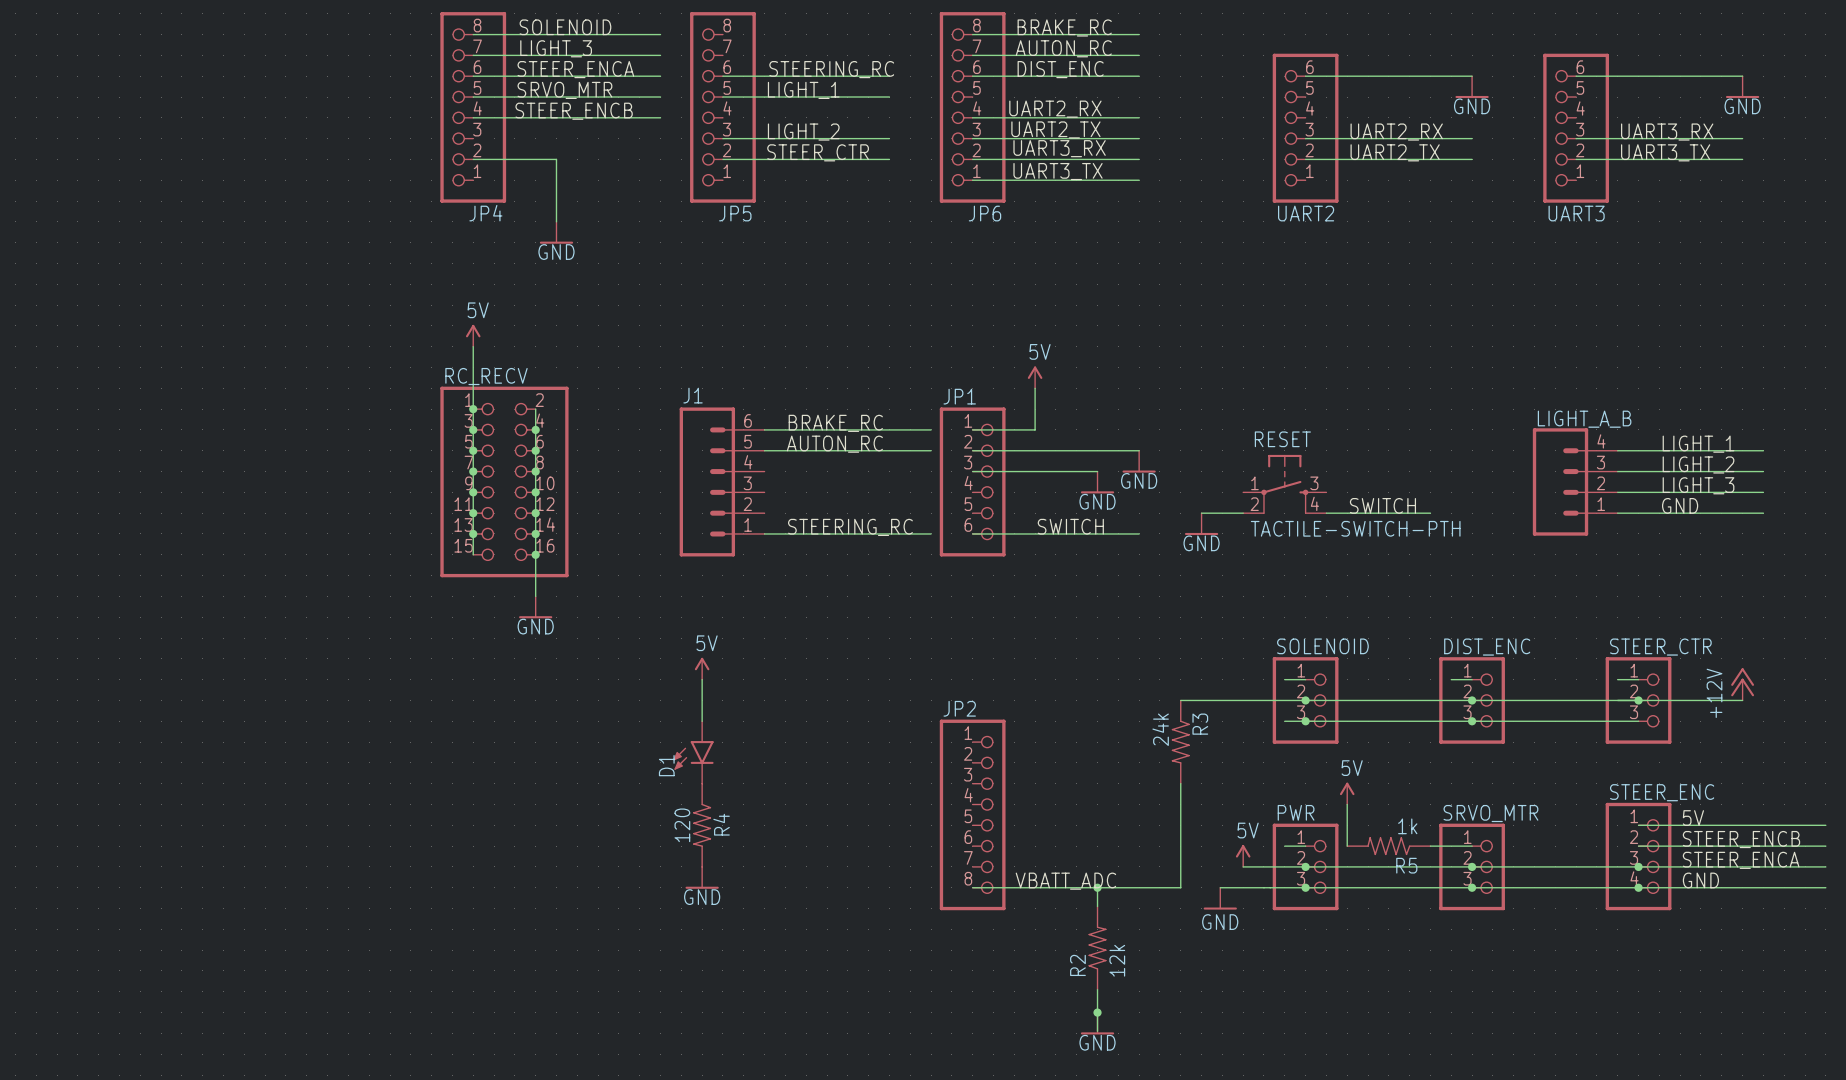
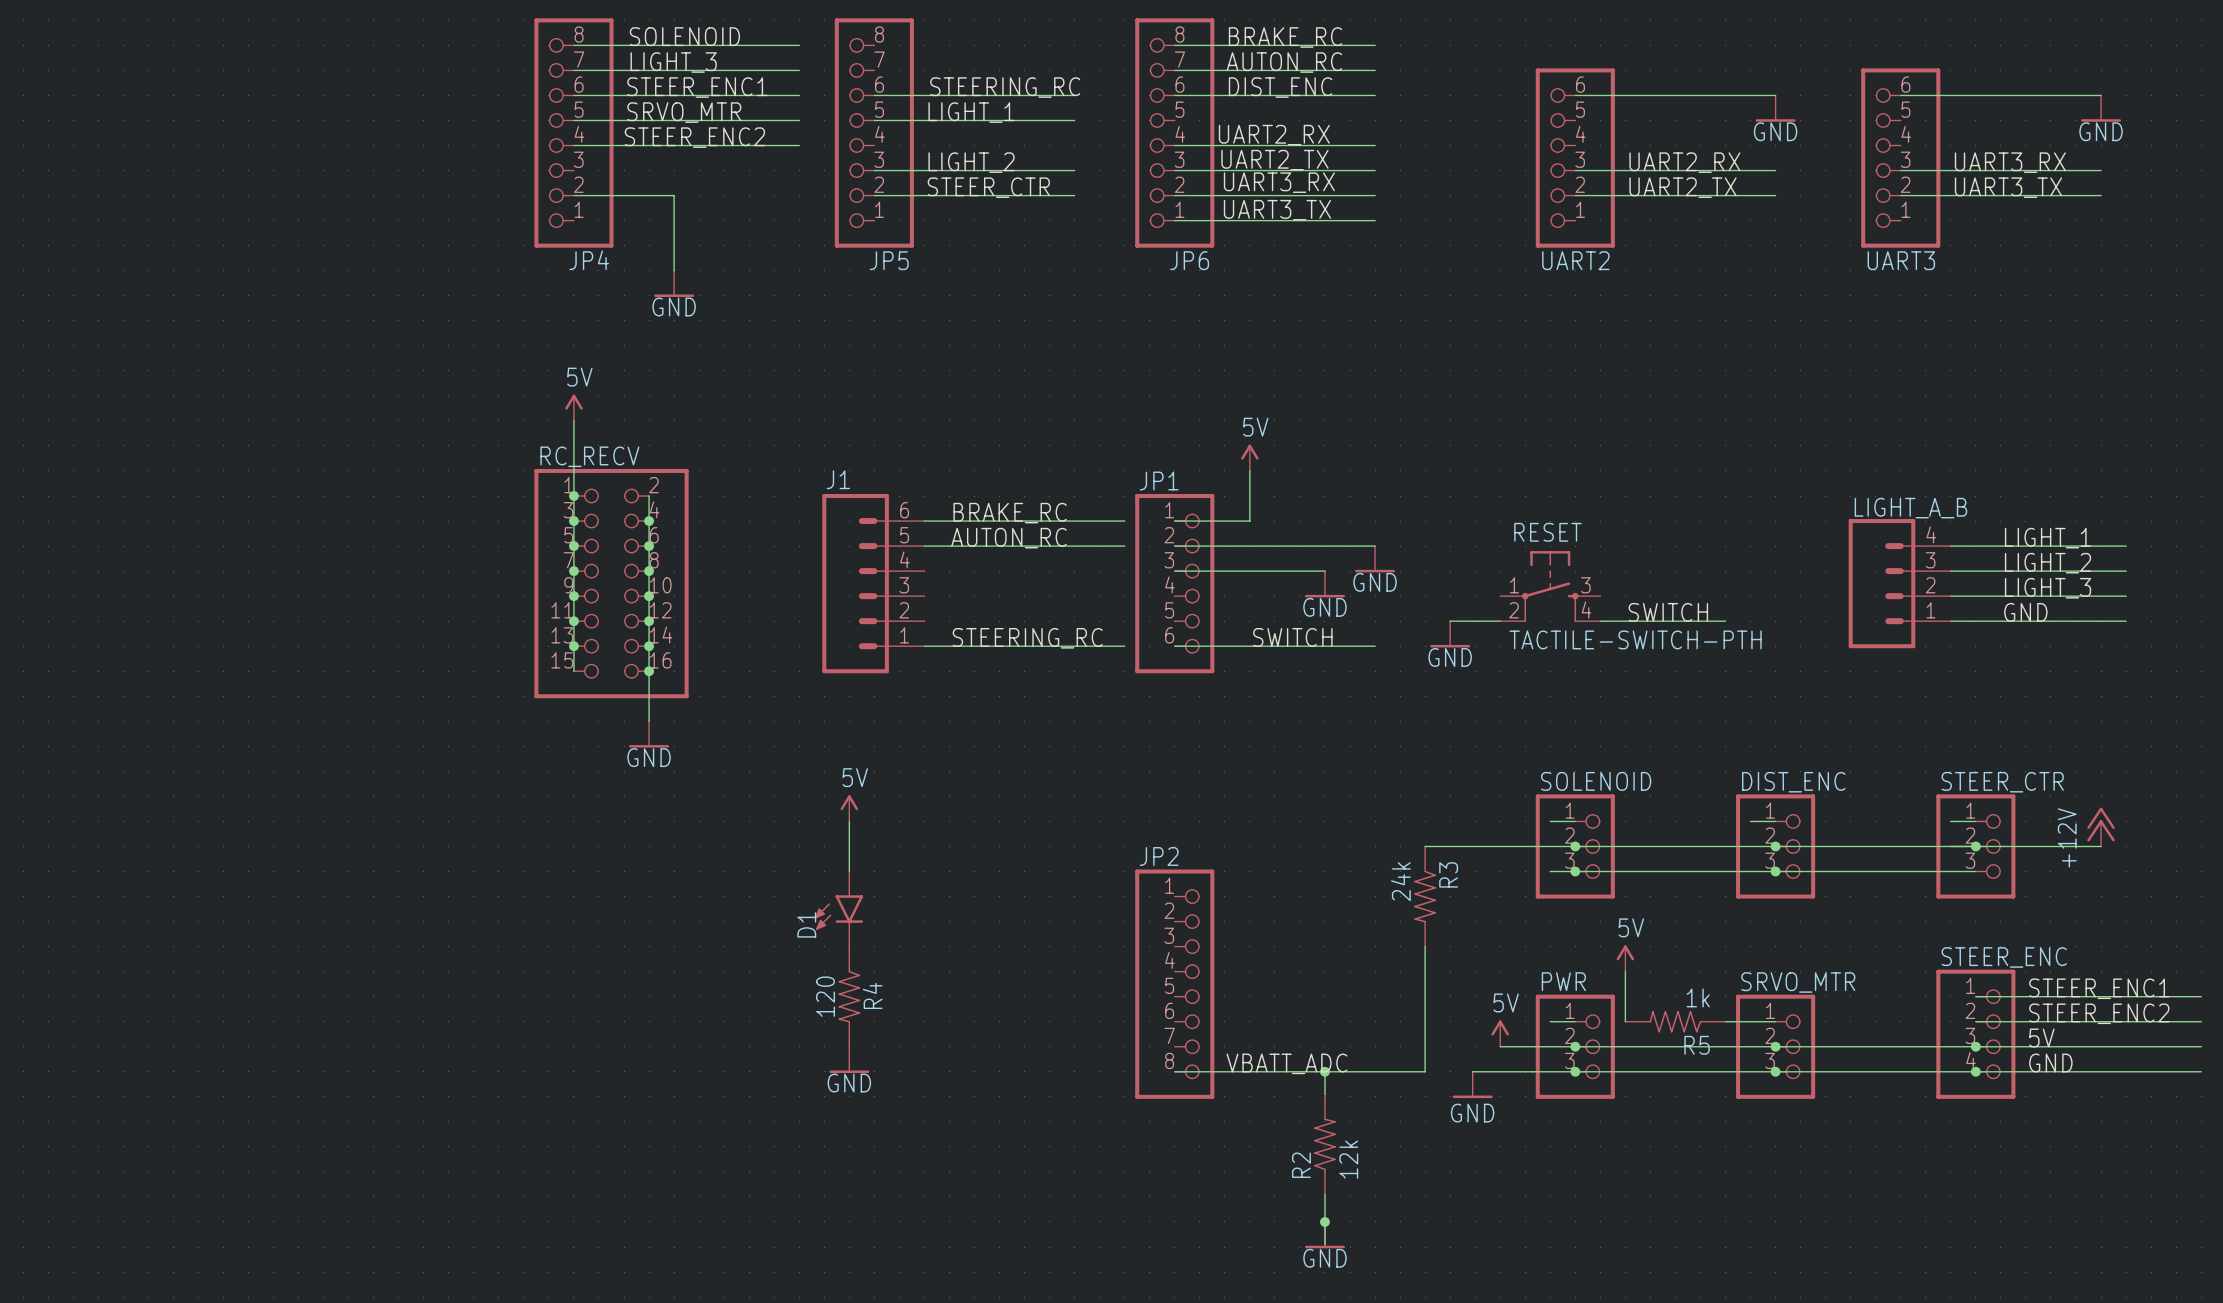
label: STEER_ENCA (575, 69) -> STEER_ENC1 (697, 87)
label: STEER_ENCB (574, 111) -> STEER_ENC2 (694, 137)
label: 5V (1693, 818) -> STEER_ENC1 (2099, 988)
label: STEER_ENCB (1741, 839) -> STEER_ENC2 (2099, 1013)
label: STEER_ENCA (1741, 860) -> 5V (2041, 1037)

